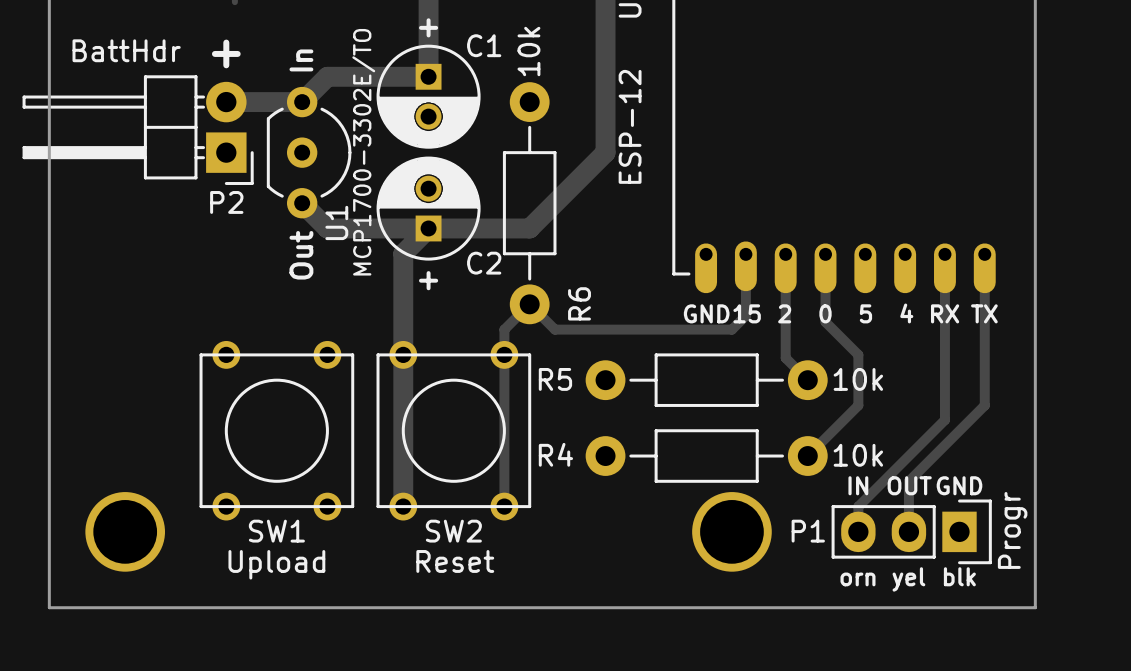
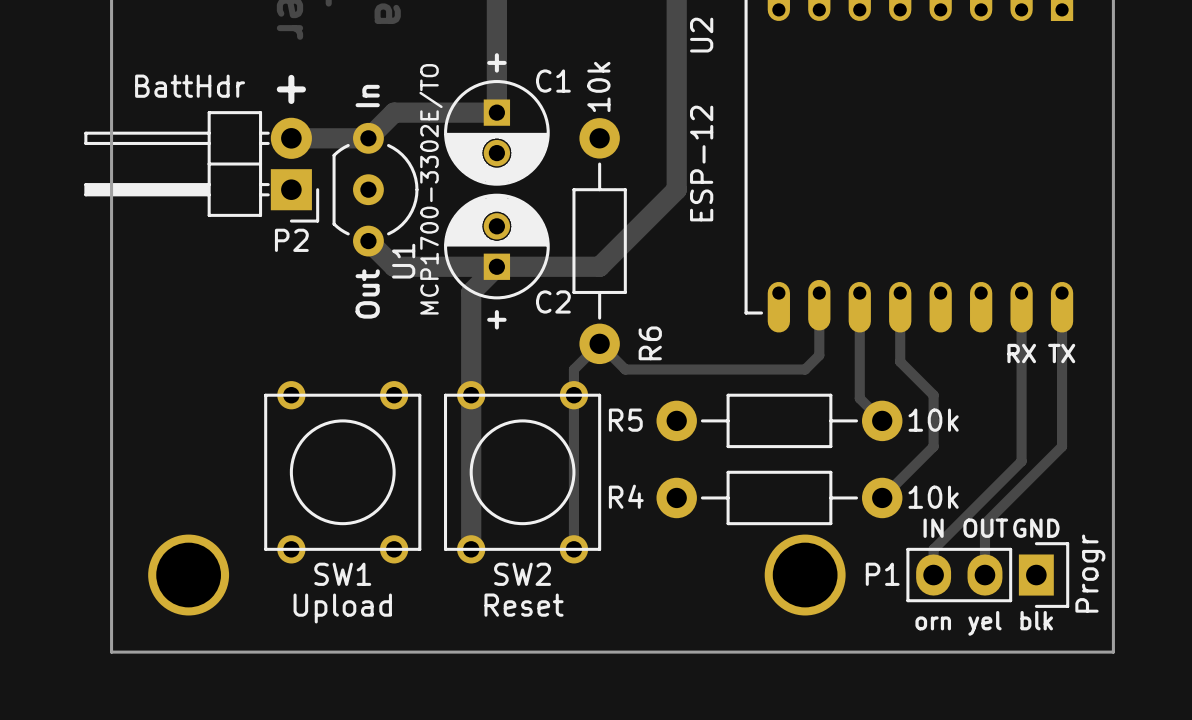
text: GND (706, 313) -> none
text: 15 (747, 313) -> none
text: 2 (784, 313) -> none
text: 0 (825, 313) -> none
text: 5 (865, 313) -> none
text: 4 (906, 313) -> none

